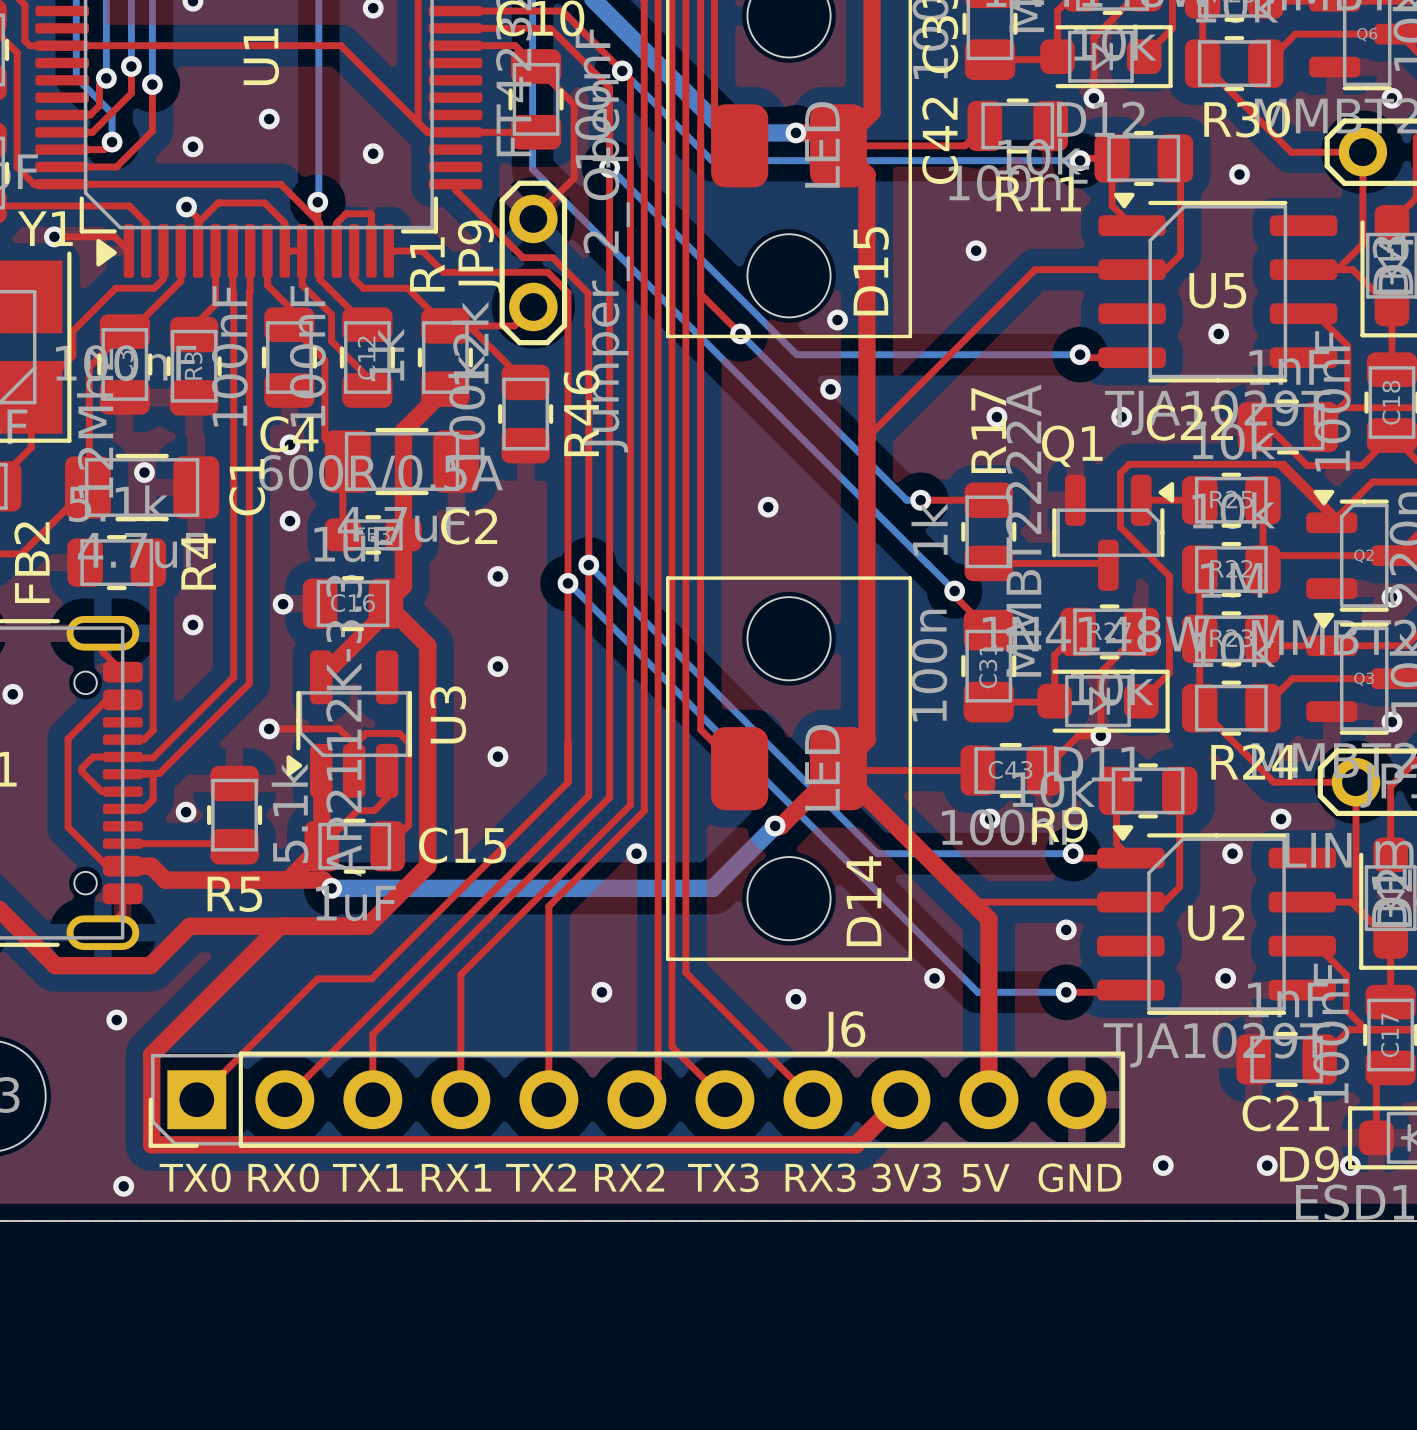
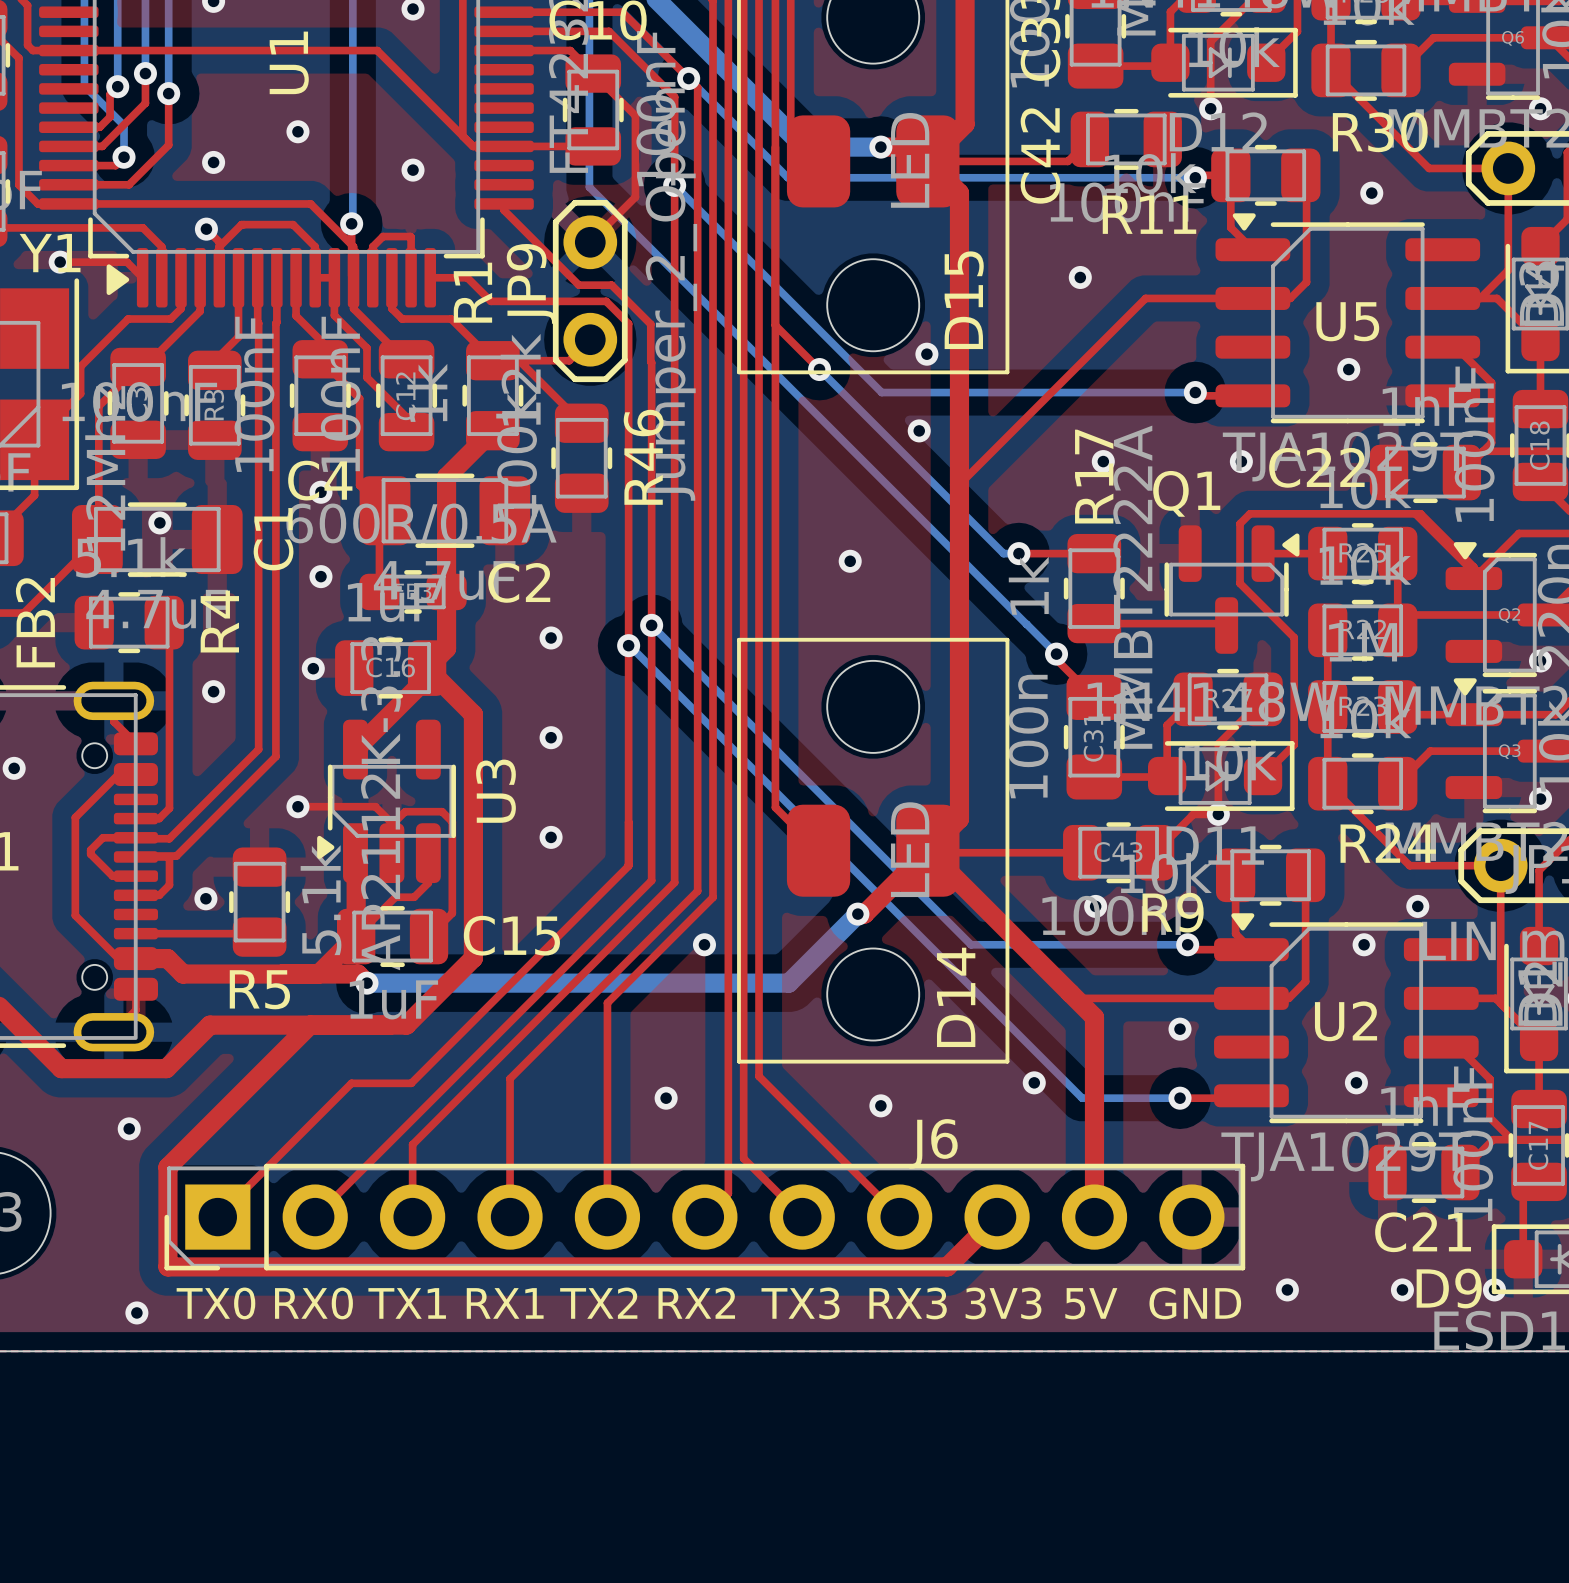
top track: (1255, 426) (1268, 426) (1307, 465) (1361, 465) (1391, 435) -> none

